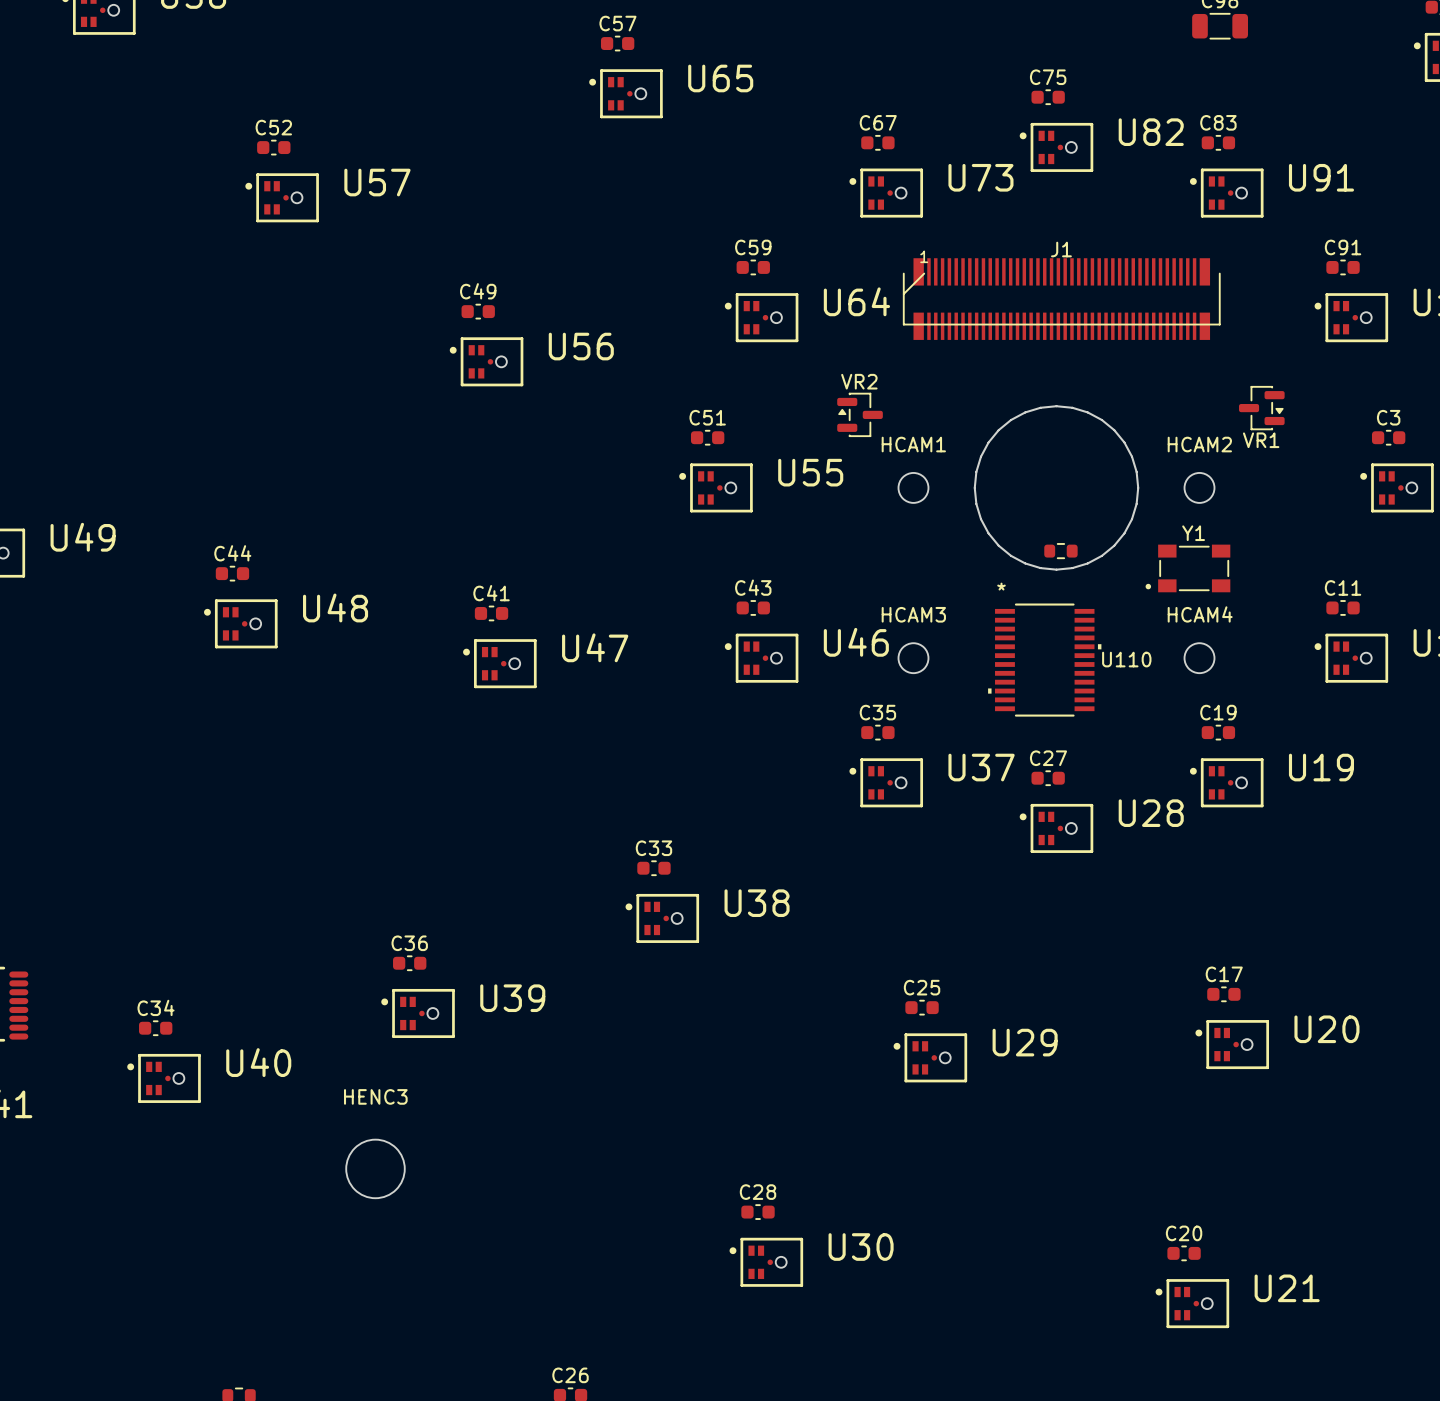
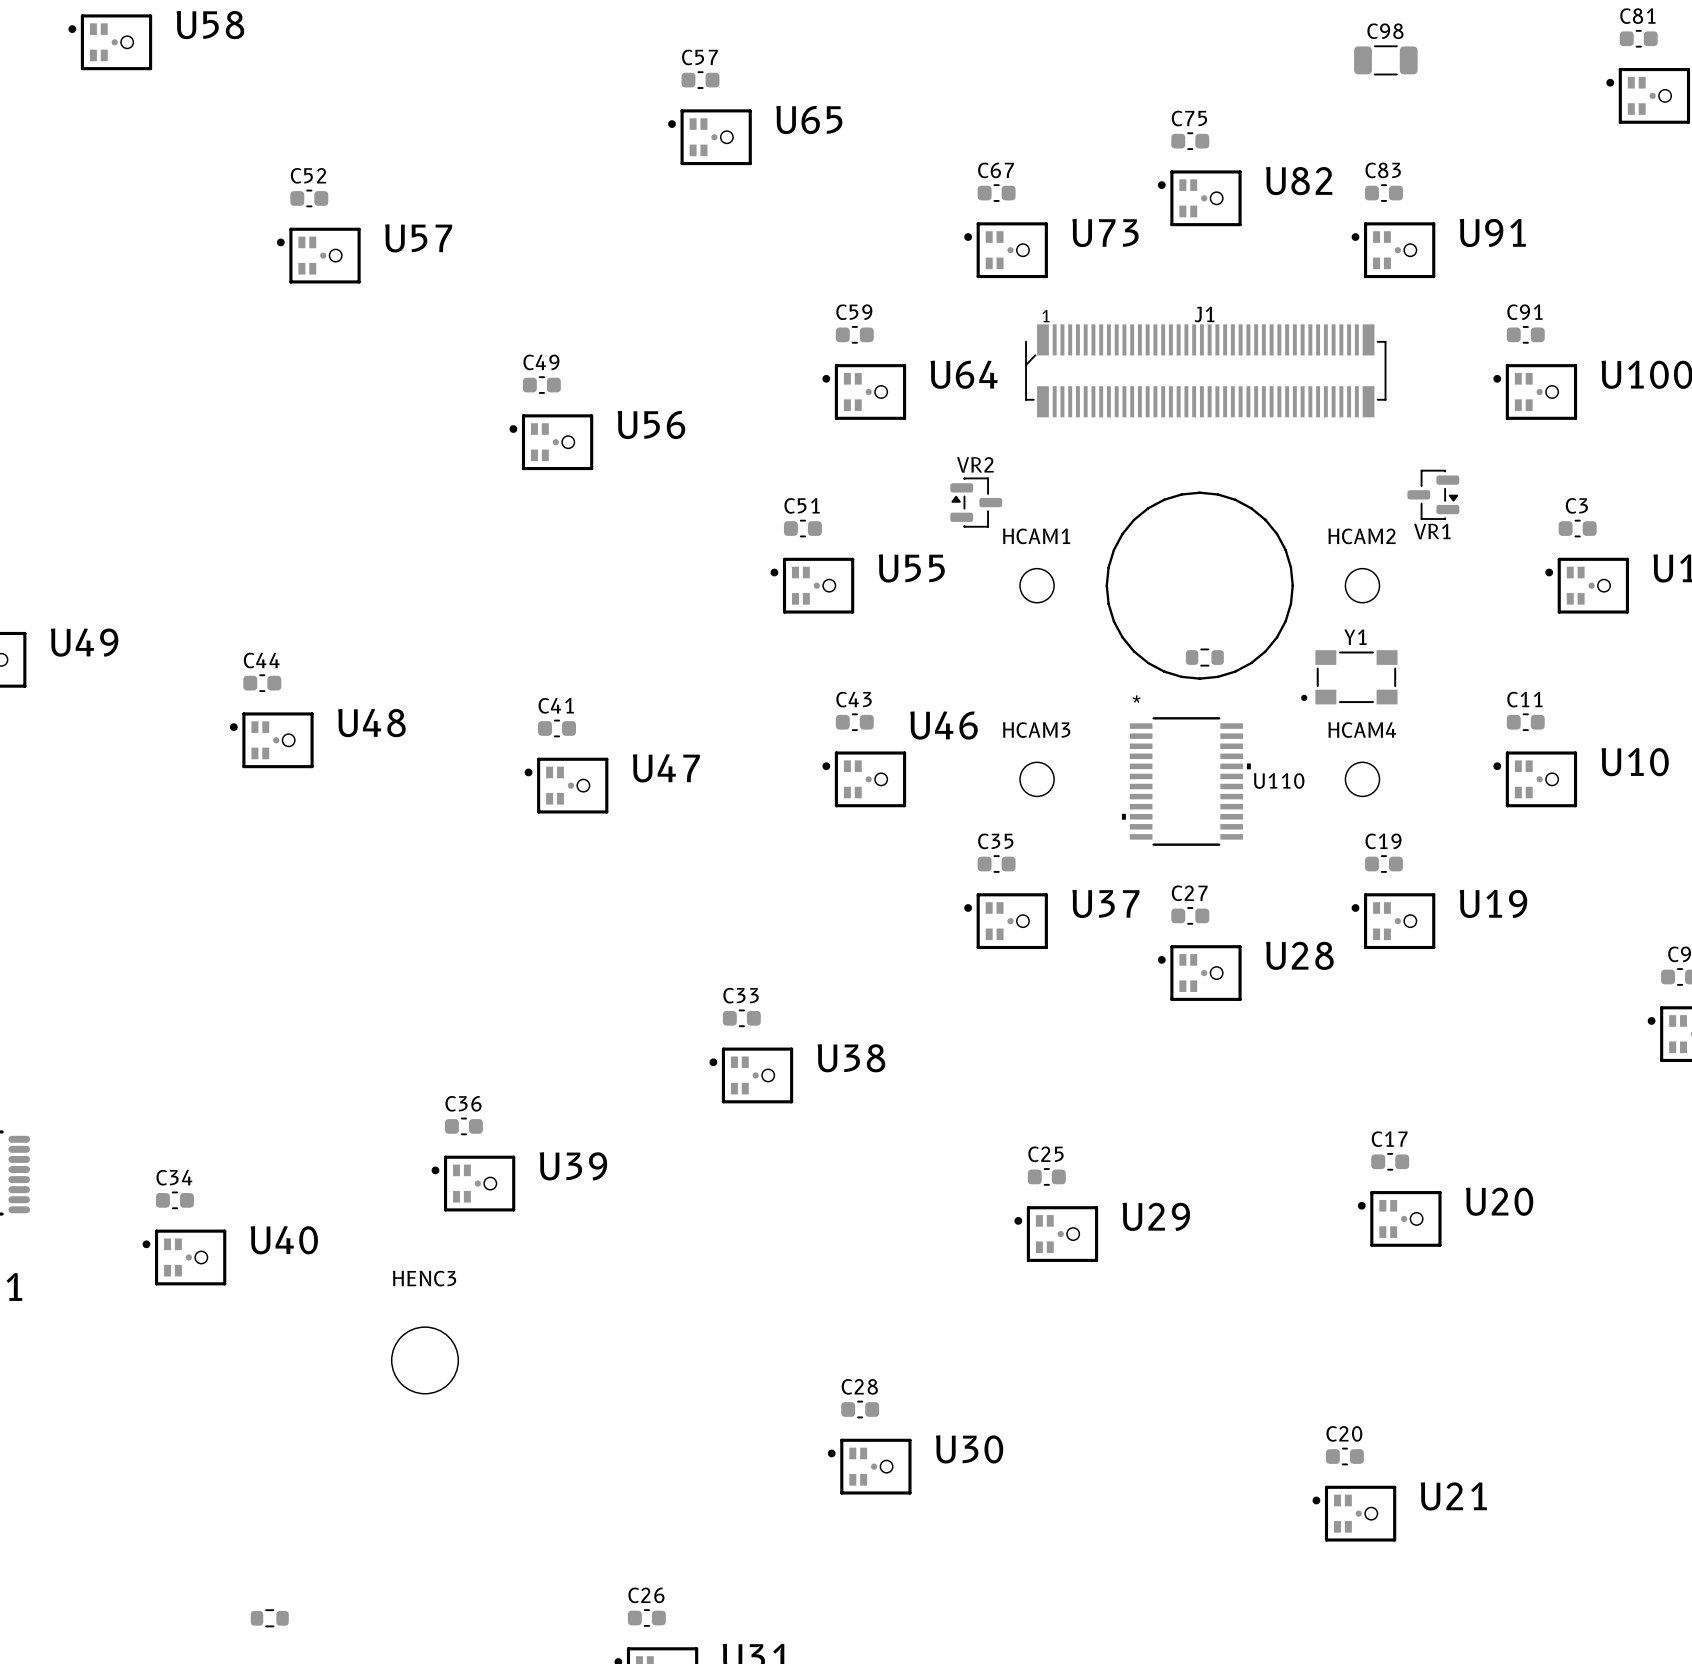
J1 footprint: [902, 258, 1221, 340] -> [1025, 324, 1387, 418]
U46 name position: U46 (856, 642) -> U46 (944, 725)

